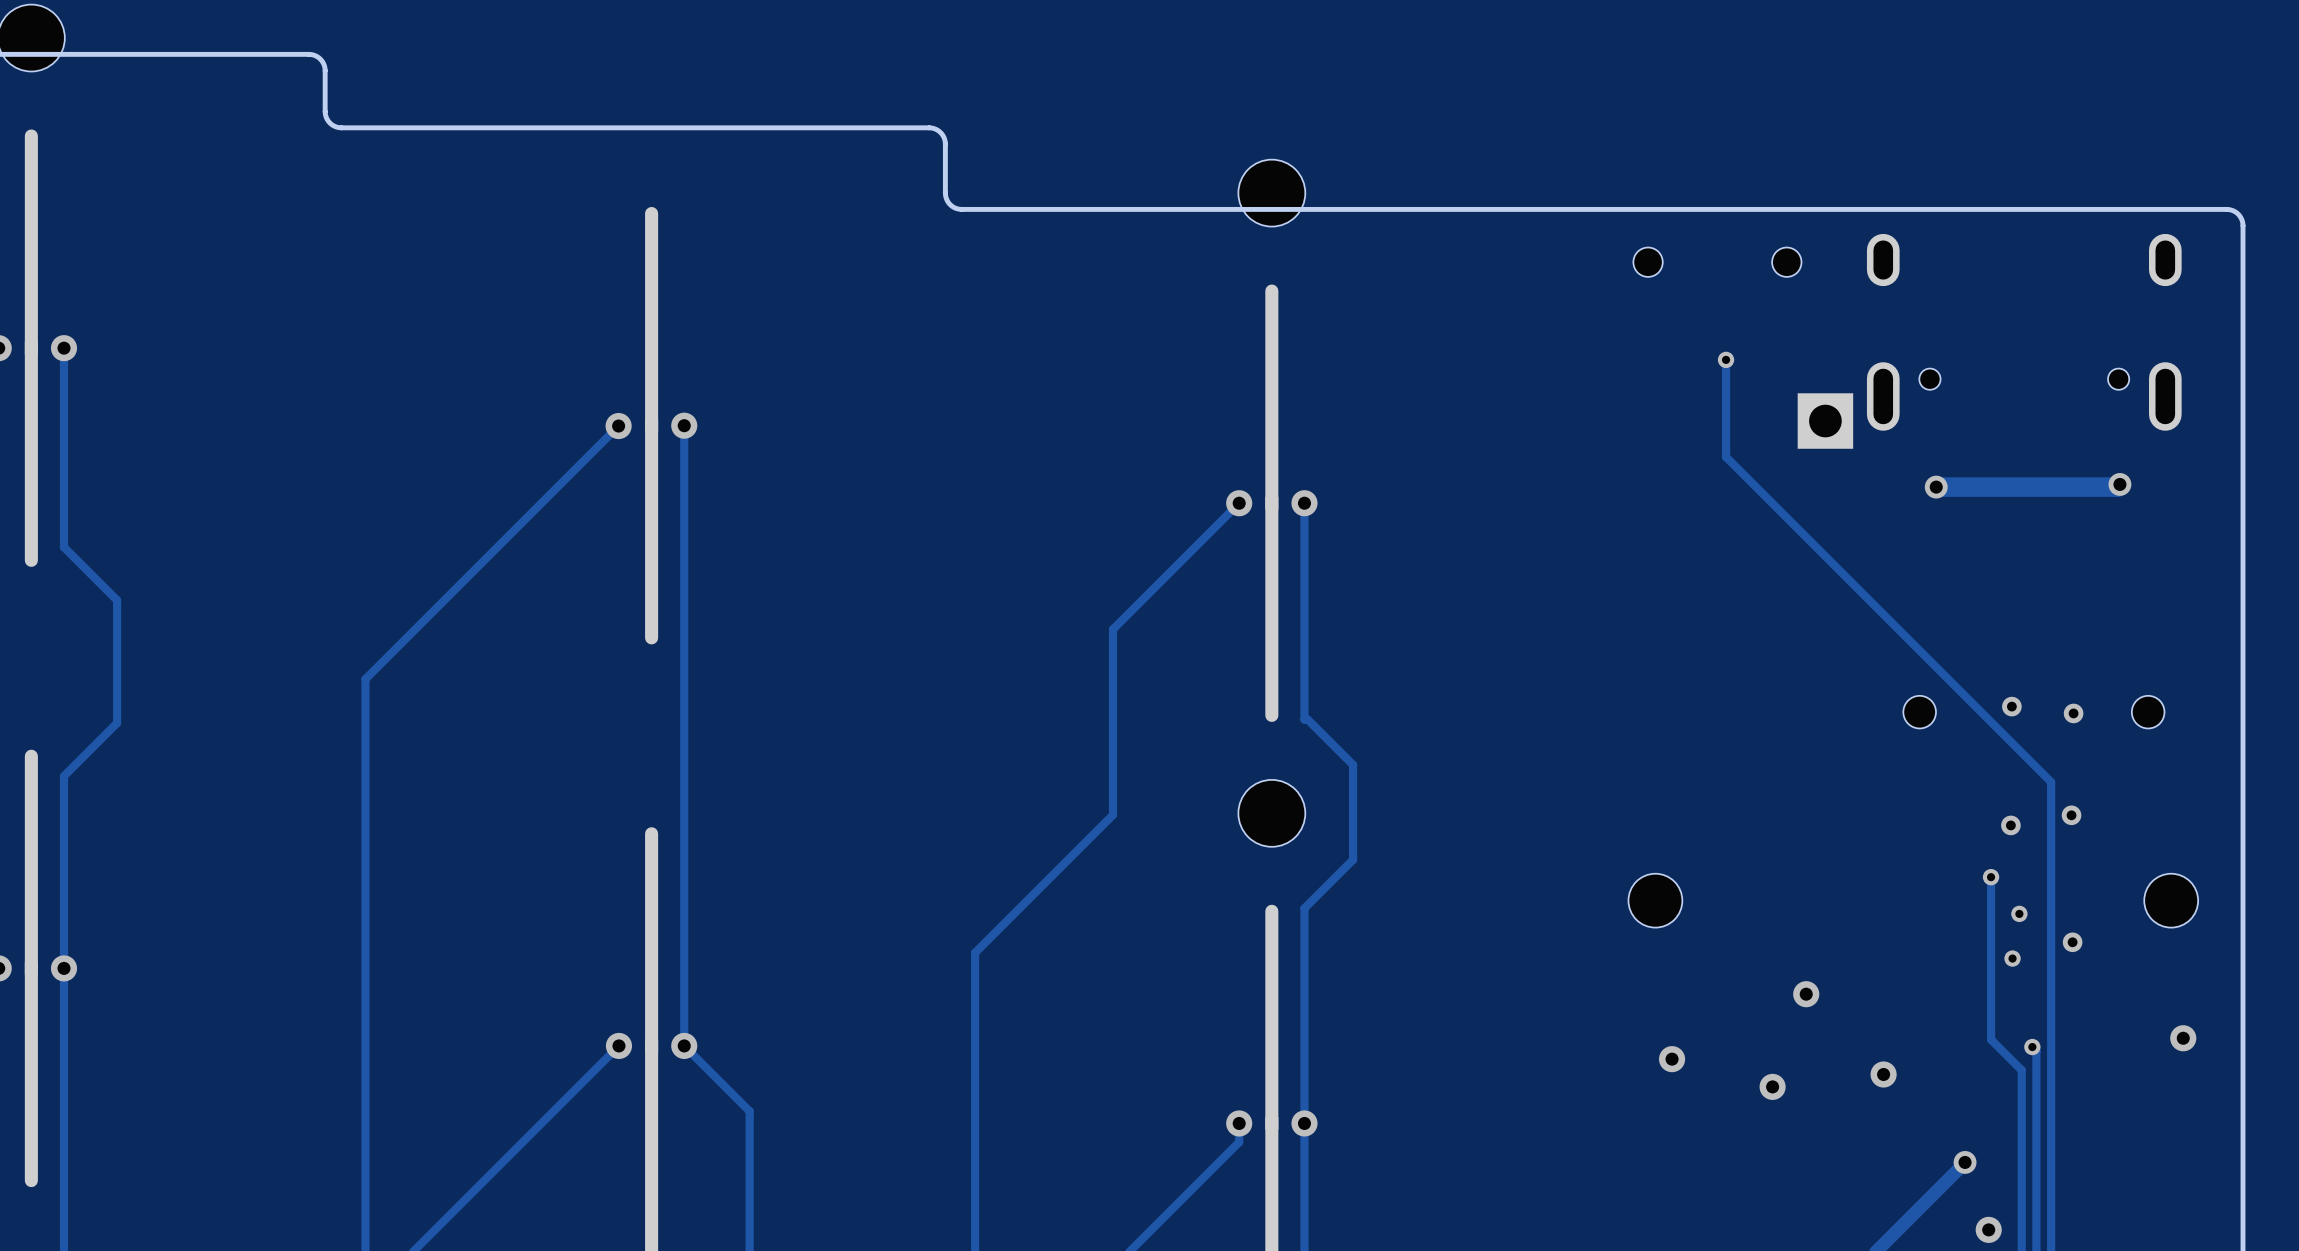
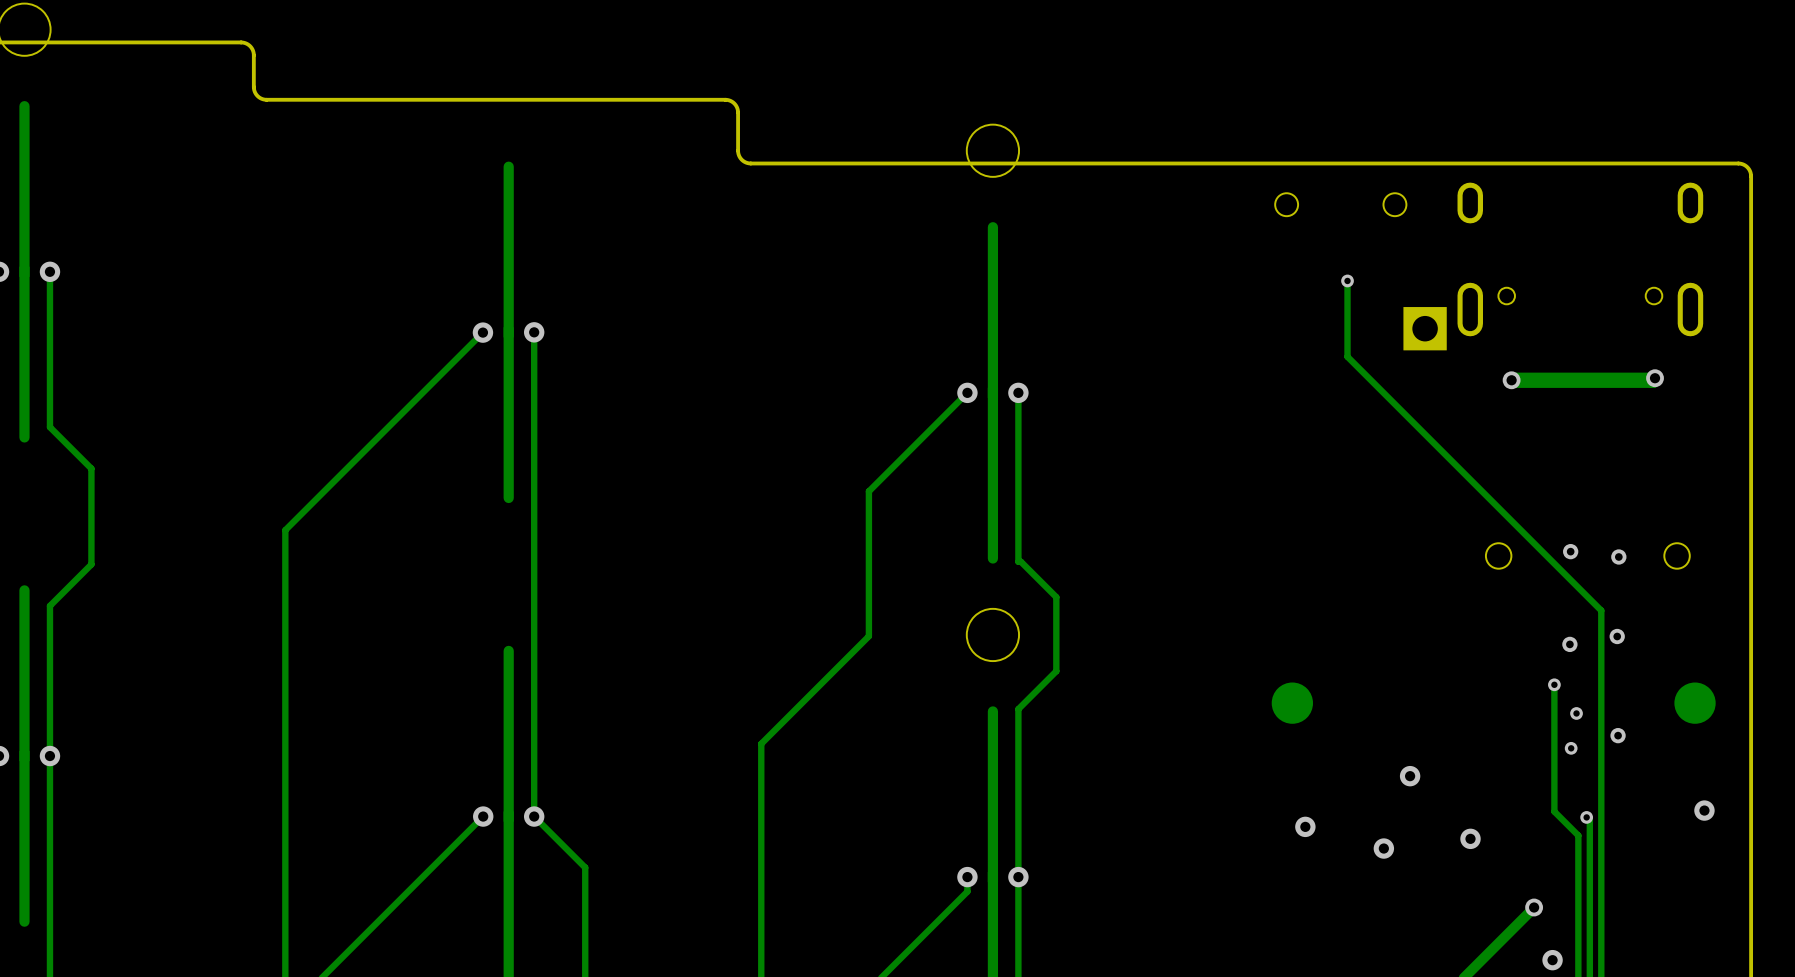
part footprint: [1628, 873, 1683, 928] -> [1271, 682, 1314, 724]
part footprint: [2144, 873, 2199, 928] -> [1674, 682, 1716, 724]

